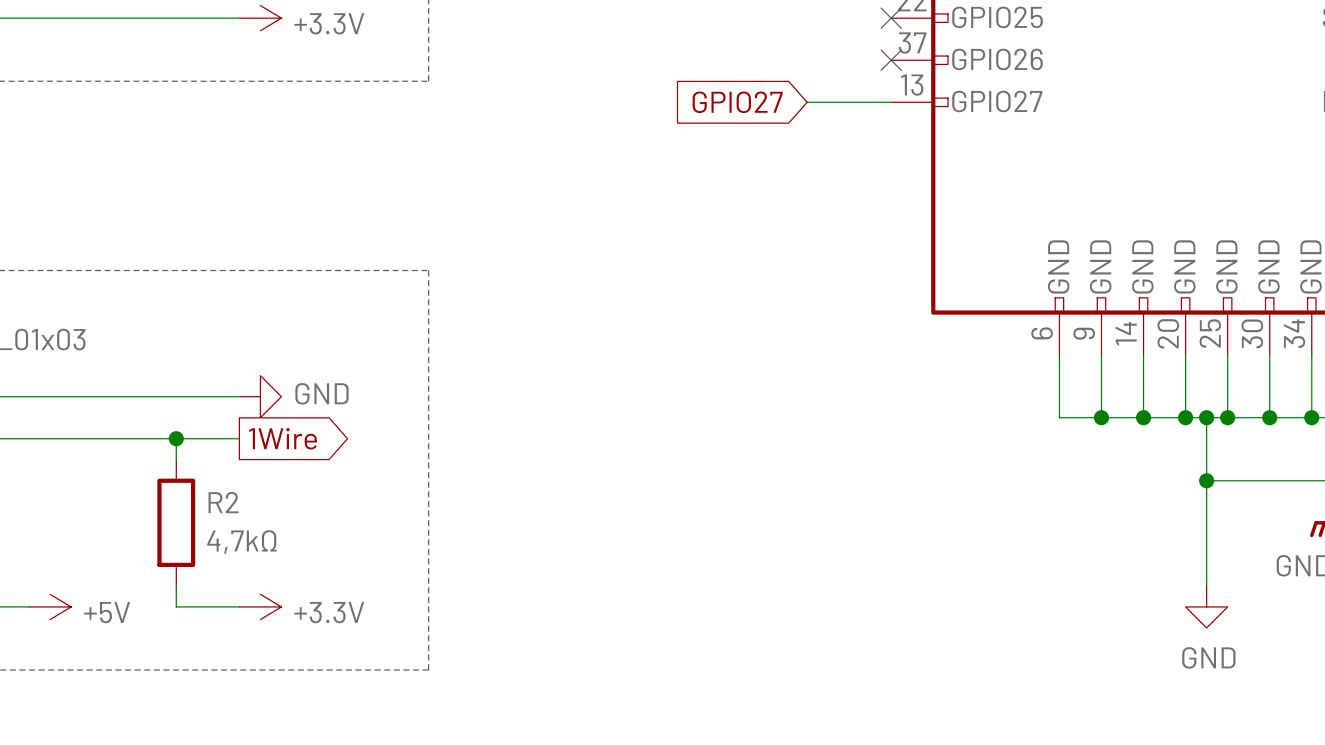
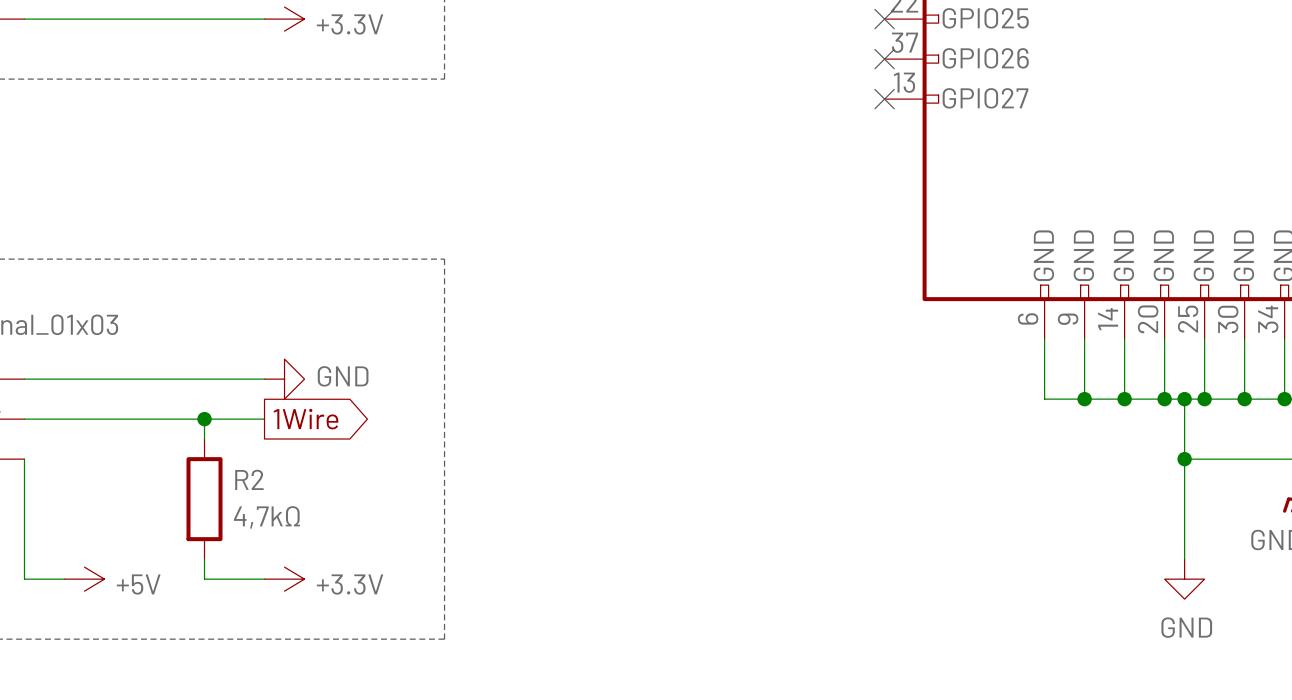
global label: GPIO27 (737, 102) -> none
wire: (807, 102) (891, 102) -> none
no-connect mark: none -> (884, 99)

